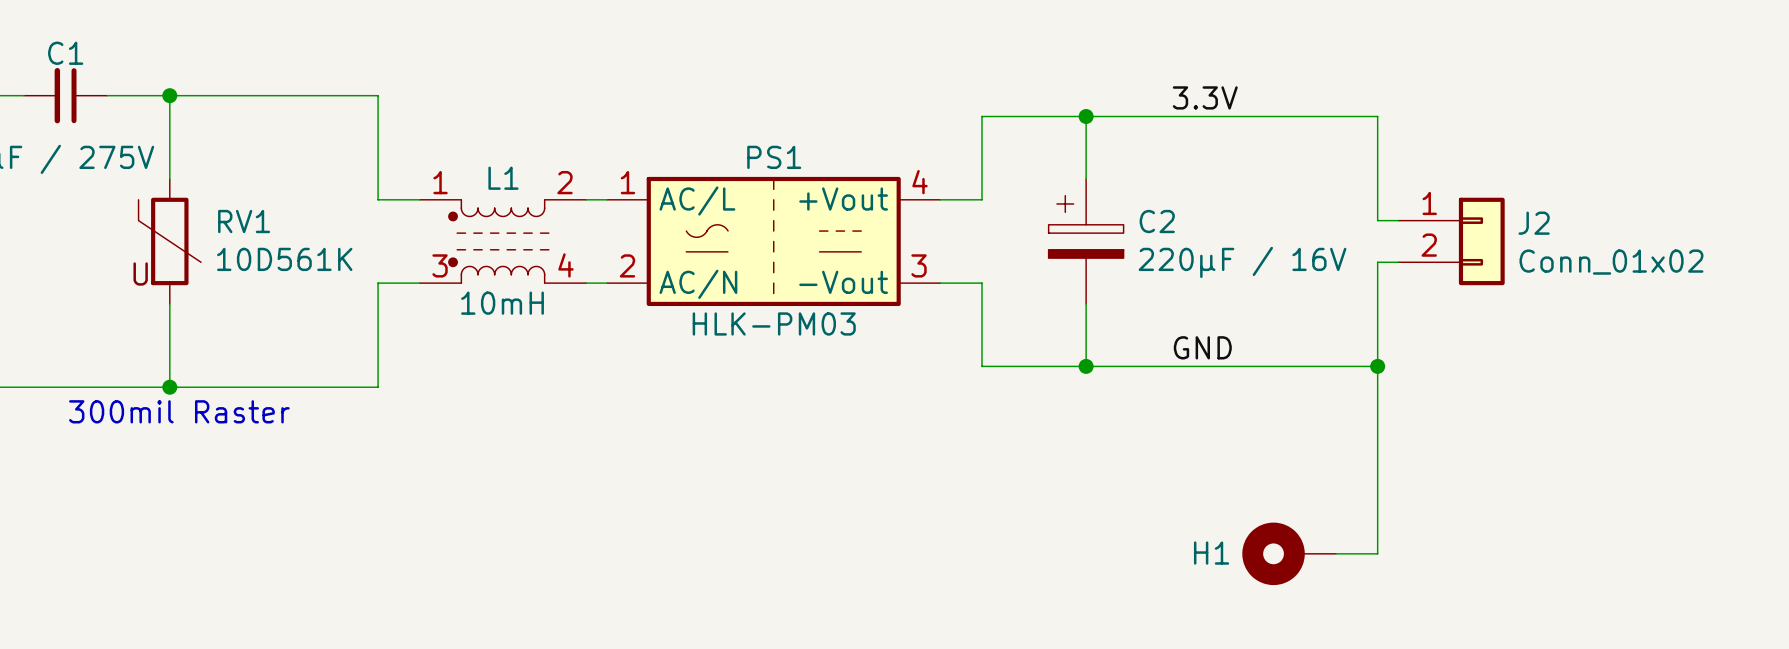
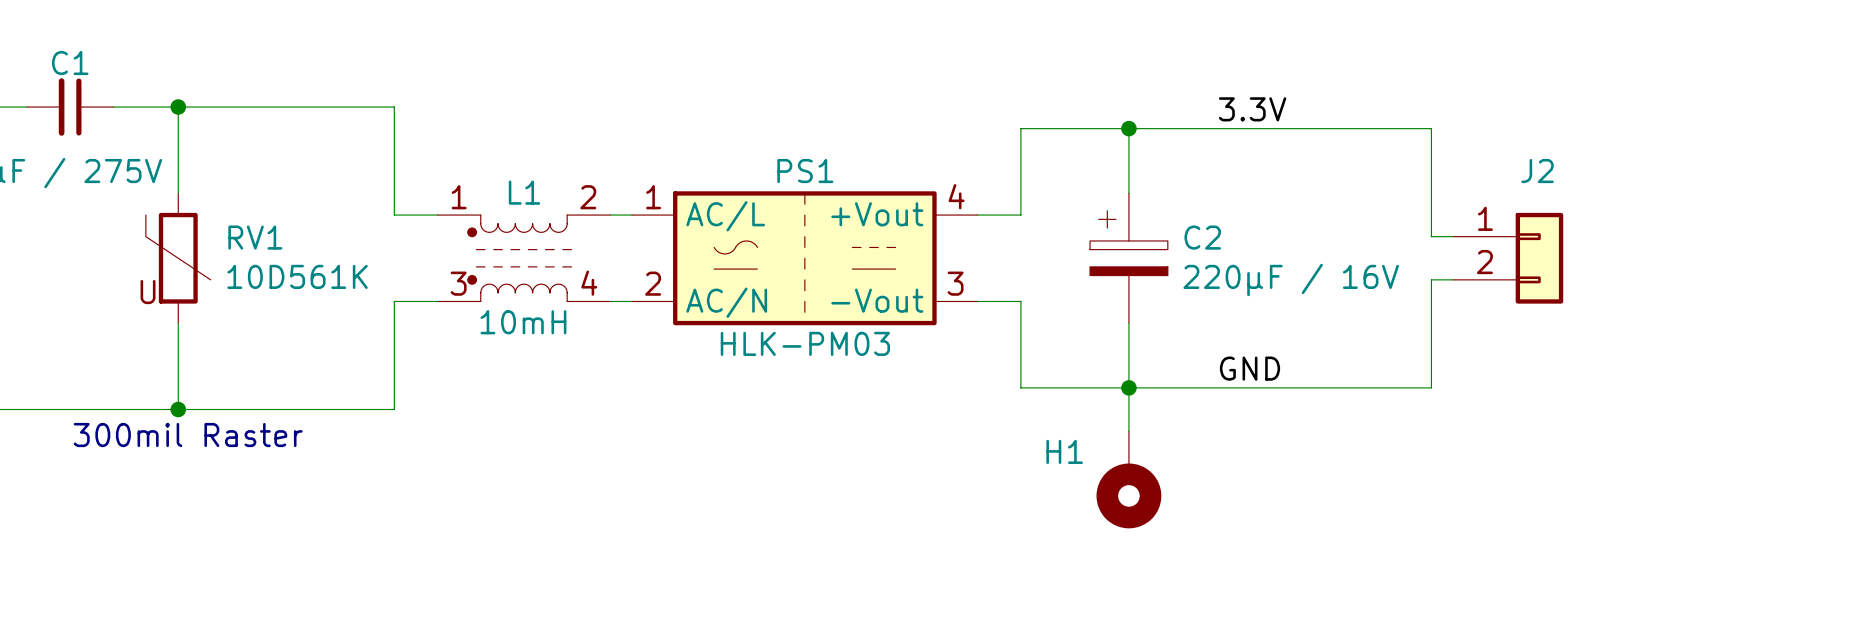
J2 name position: J2 (1534, 223) -> J2 (1537, 171)
J2 value: Conn_01x02 (1611, 262) -> none
wire: none -> (1128, 387) (1128, 431)
wire: (1377, 366) (1377, 553) (1336, 553) -> none
junction: (1377, 366) -> none
H1 rotation: 0° (1273, 553) -> 90° counterclockwise (1128, 495)
H1 position: (1289, 553) -> (1128, 479)

